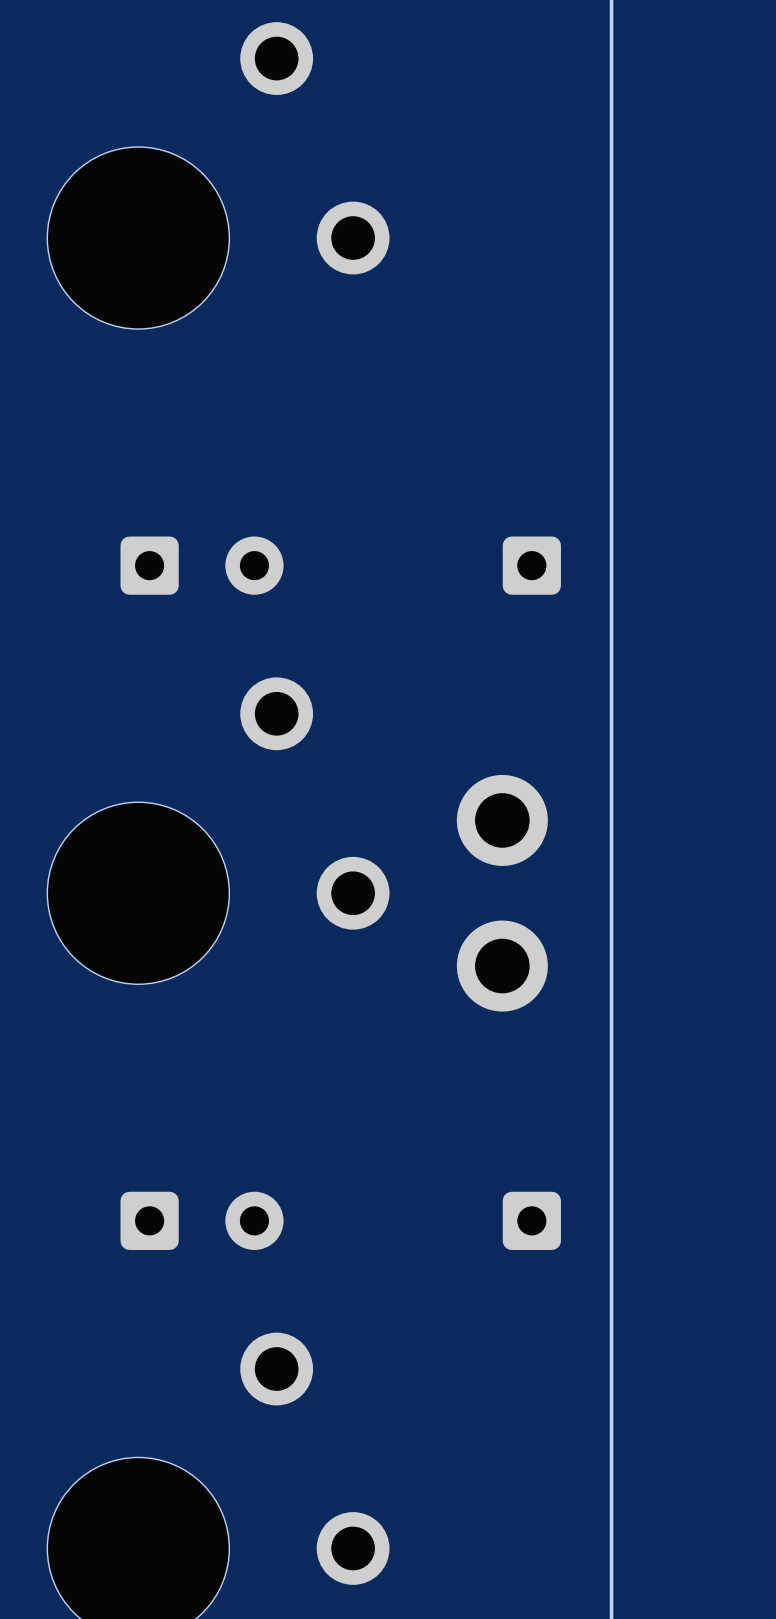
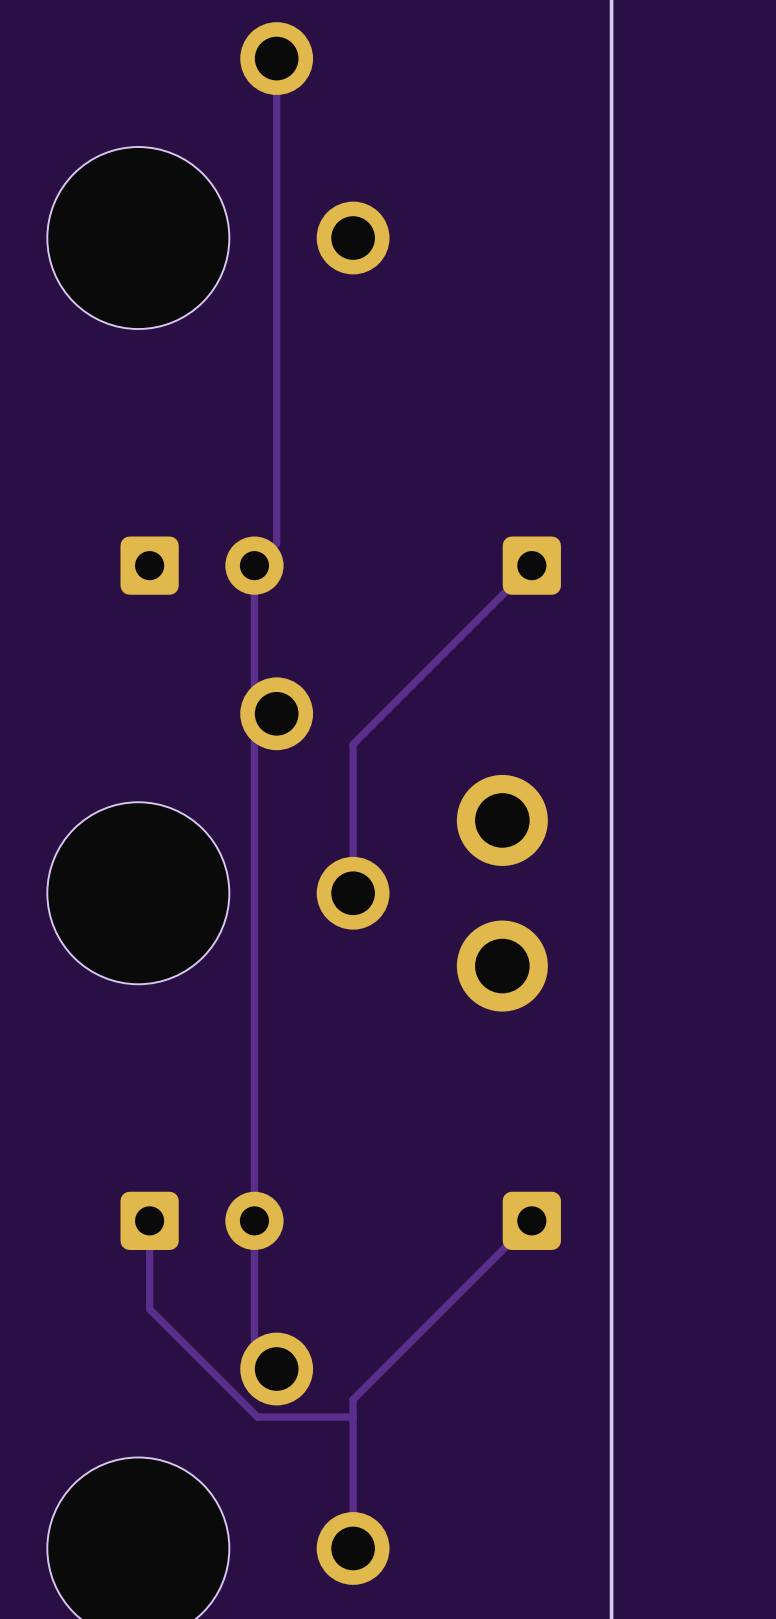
track: none -> (276, 58) (276, 543) (254, 565) (254, 691) (276, 713) (254, 735) (254, 1346) (276, 1369)
track: none -> (531, 565) (353, 744) (353, 893)
track: none -> (149, 1220) (149, 1309) (257, 1417) (353, 1417)
track: none -> (531, 1220) (353, 1399) (353, 1548)

